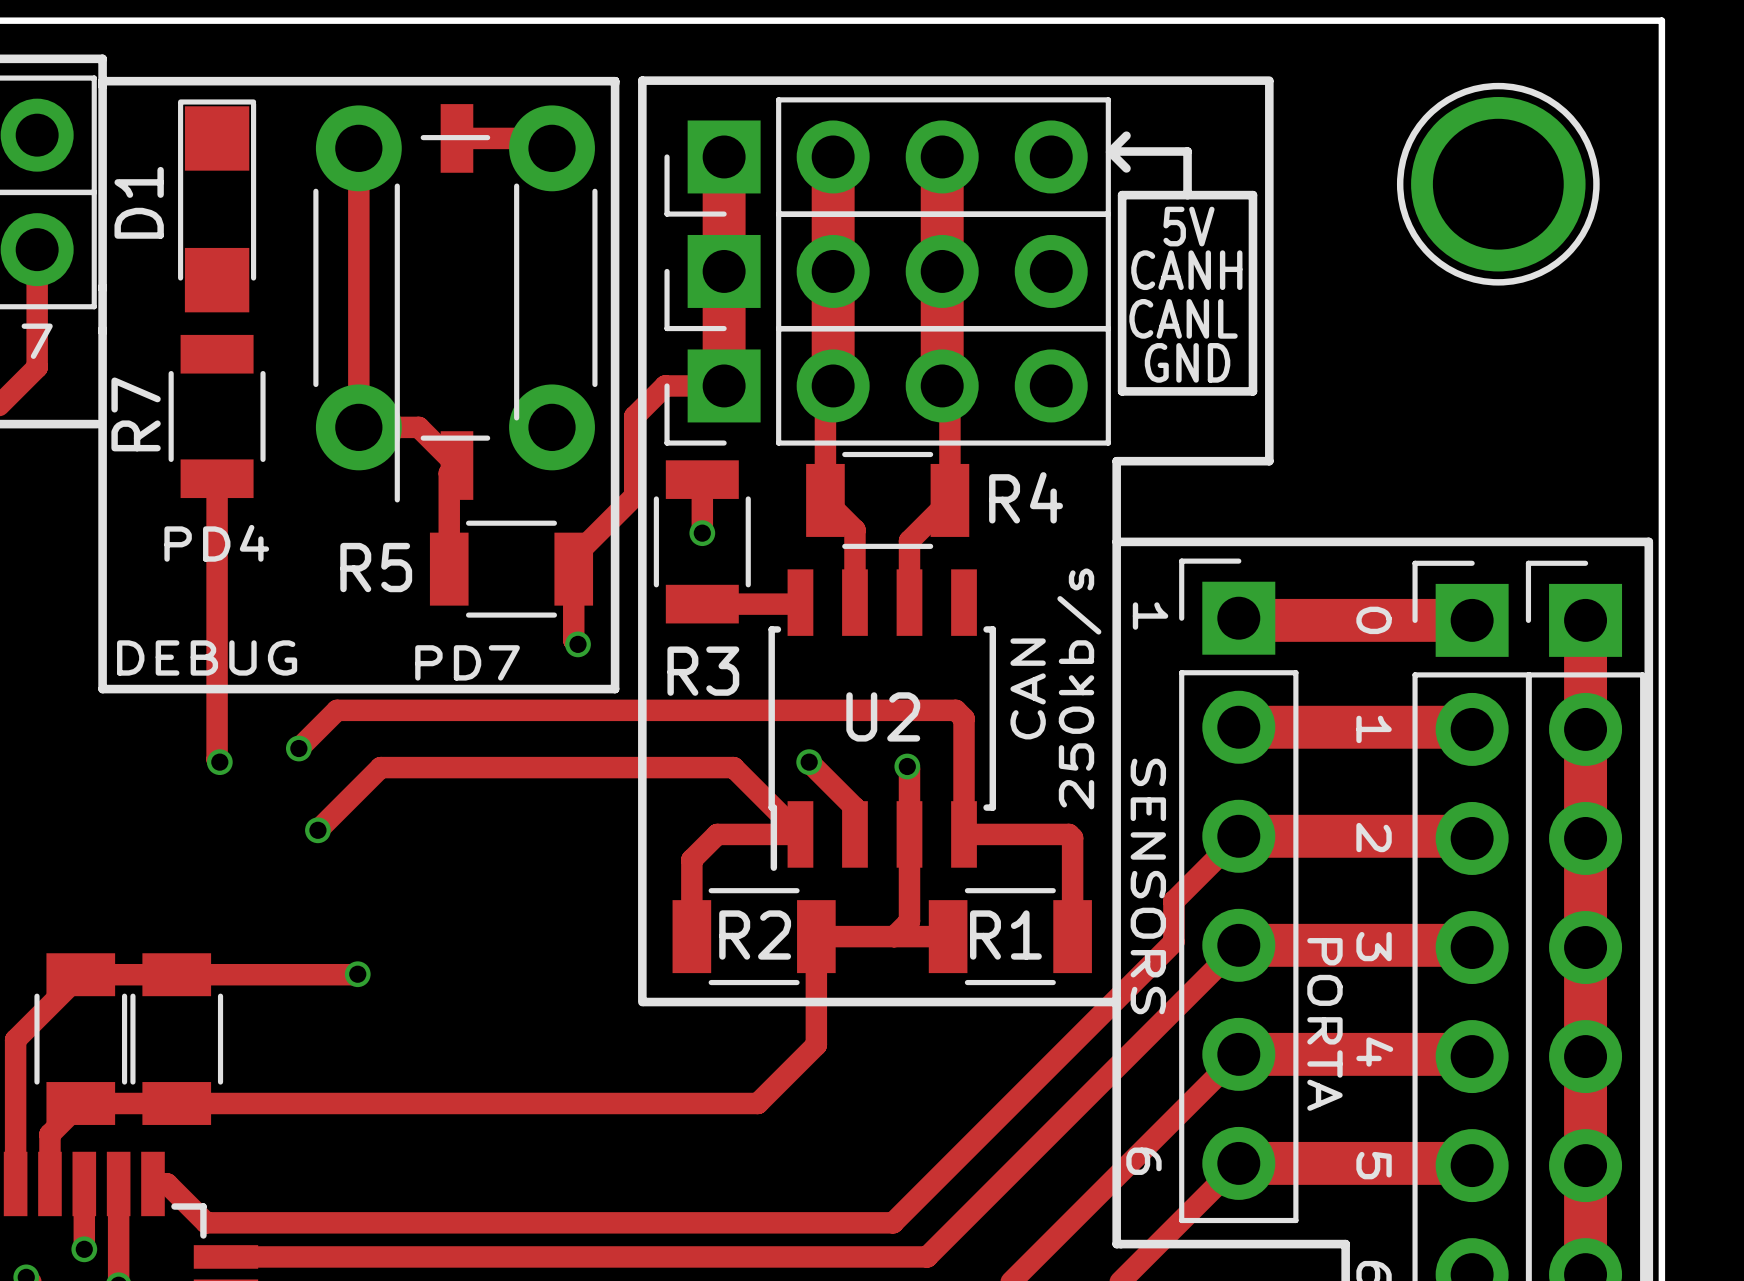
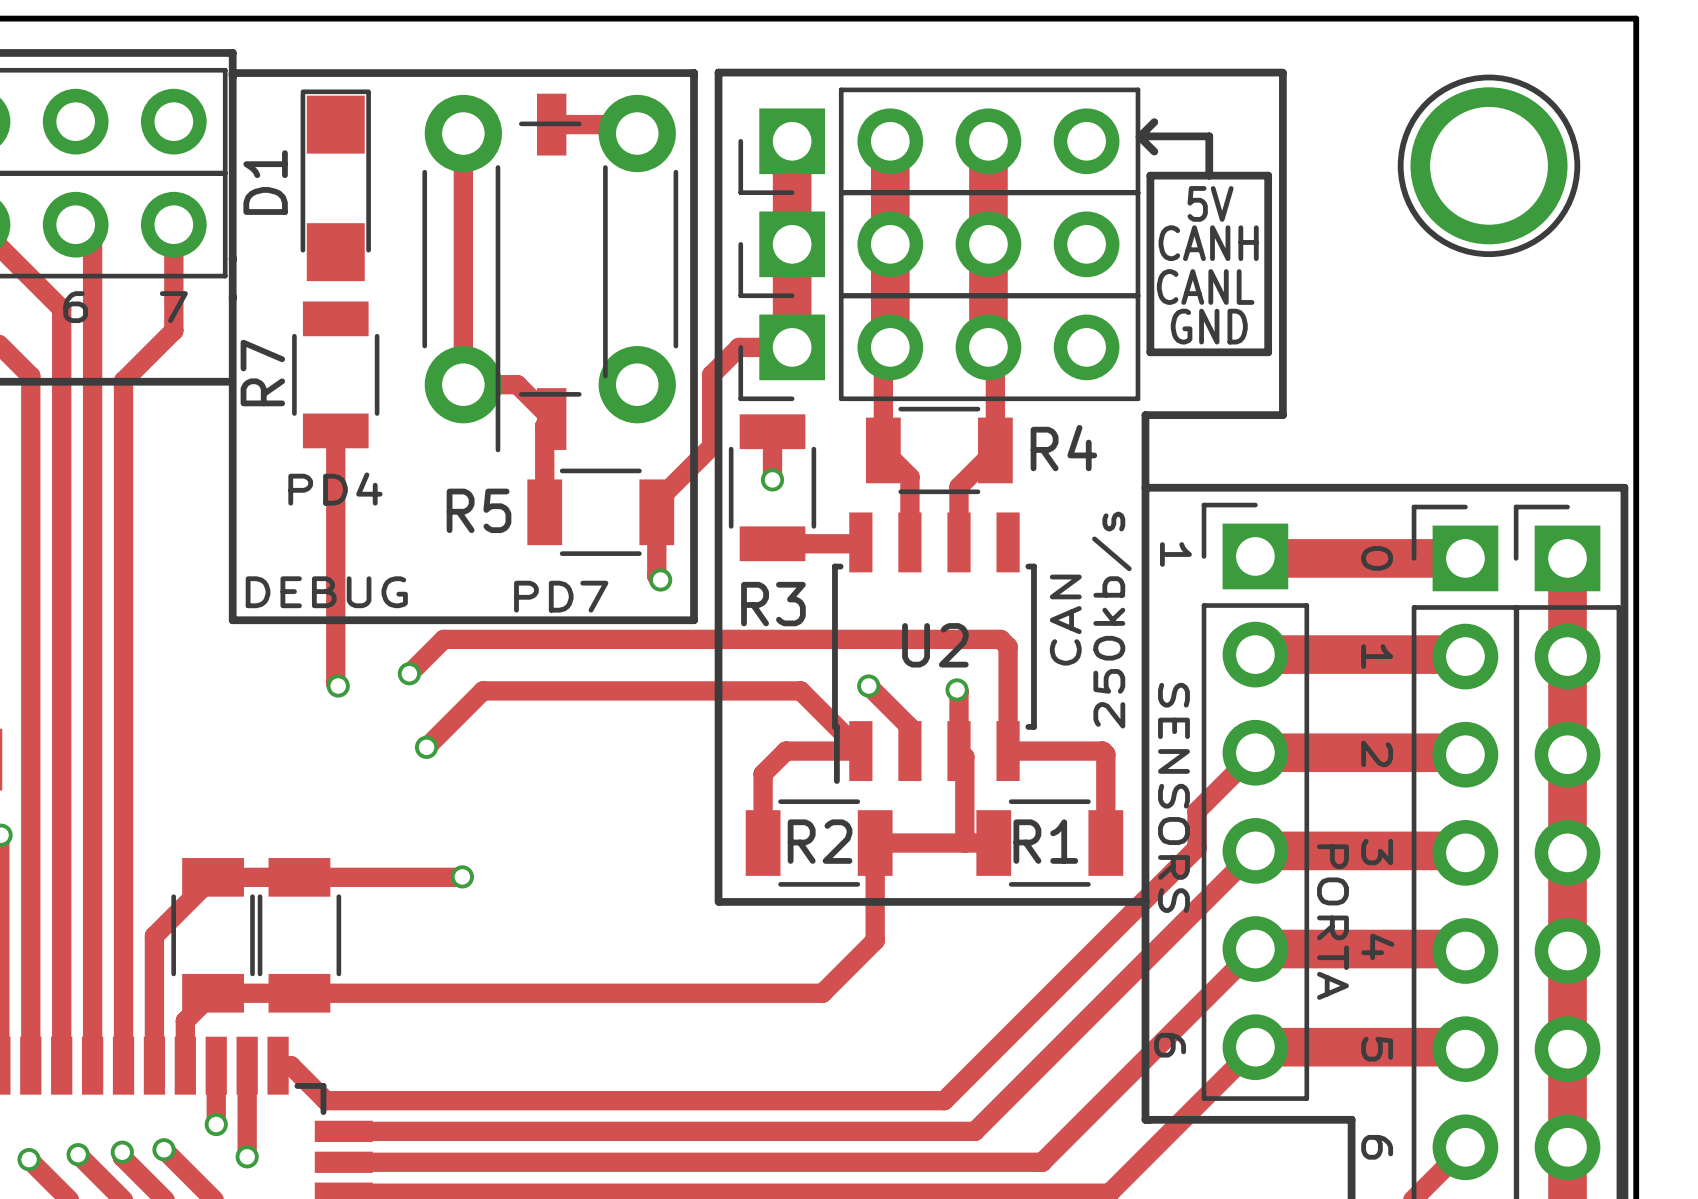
track: (909, 834) (909, 921) (894, 936) -> (959, 751) (964, 756) (964, 843)

